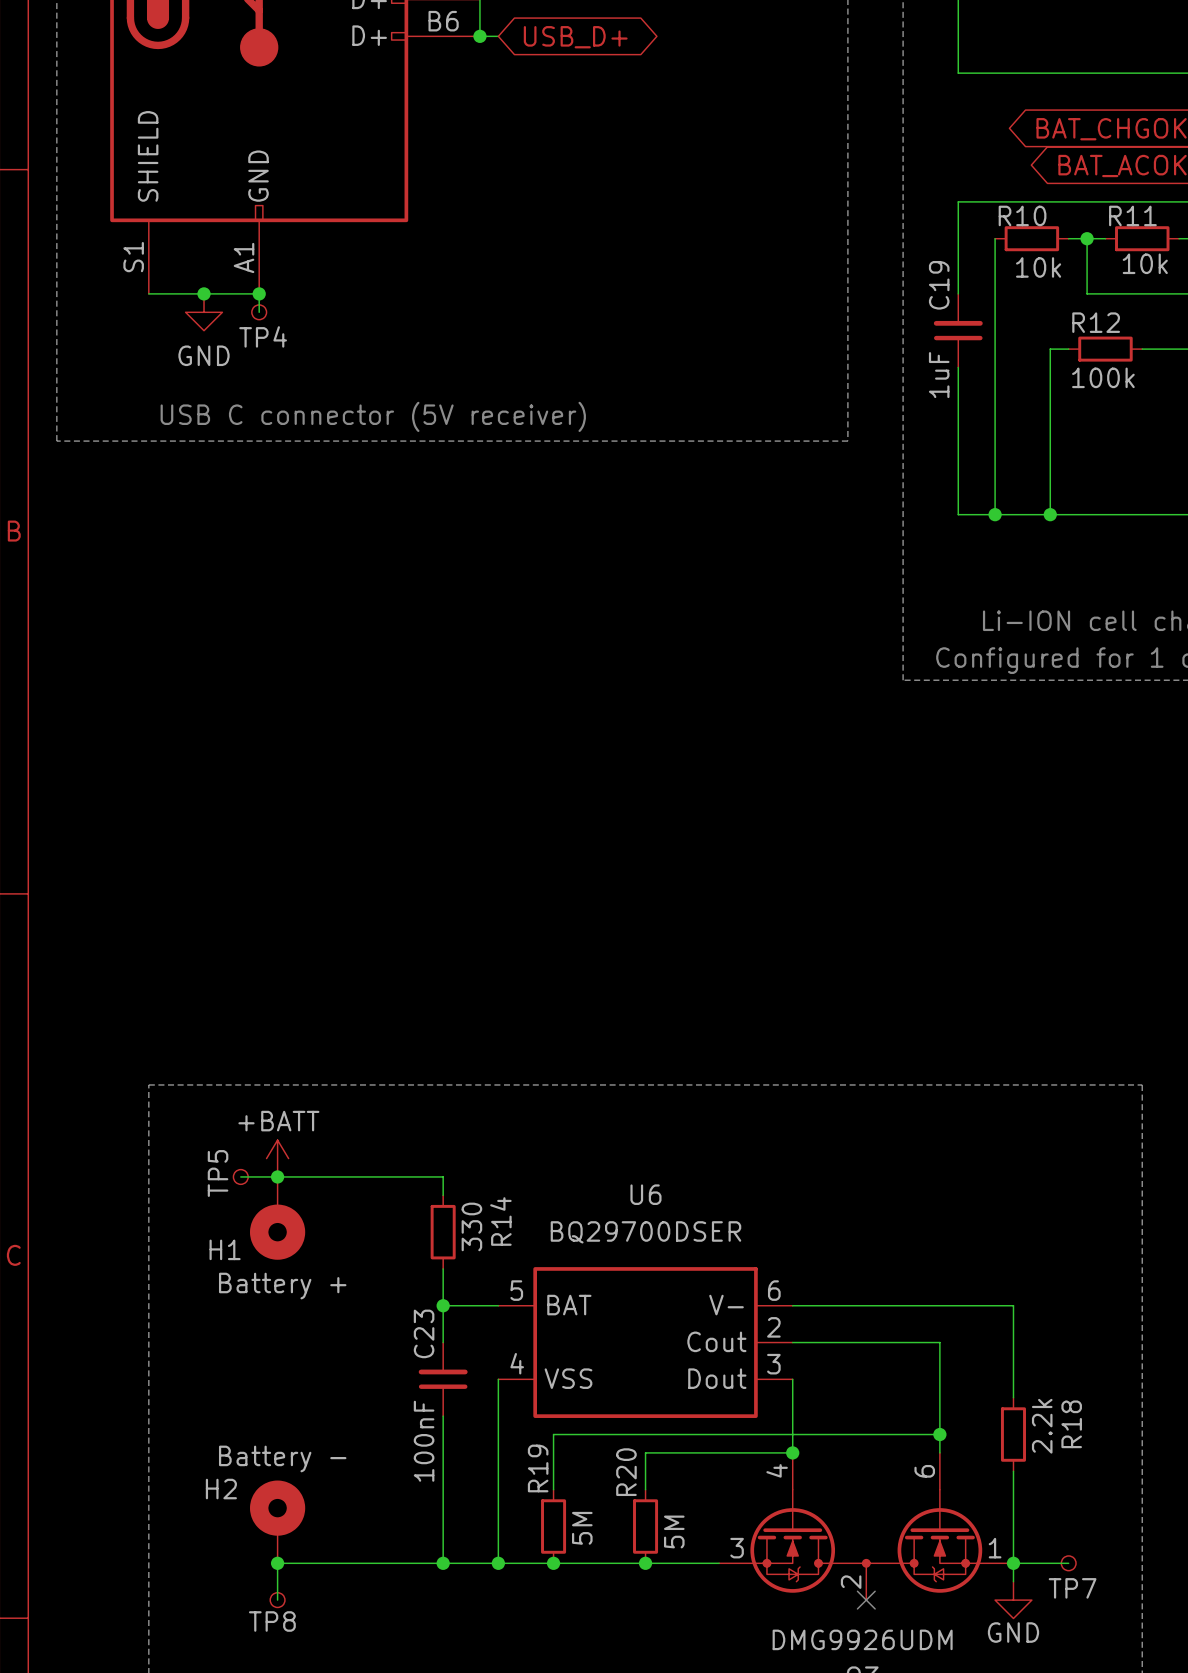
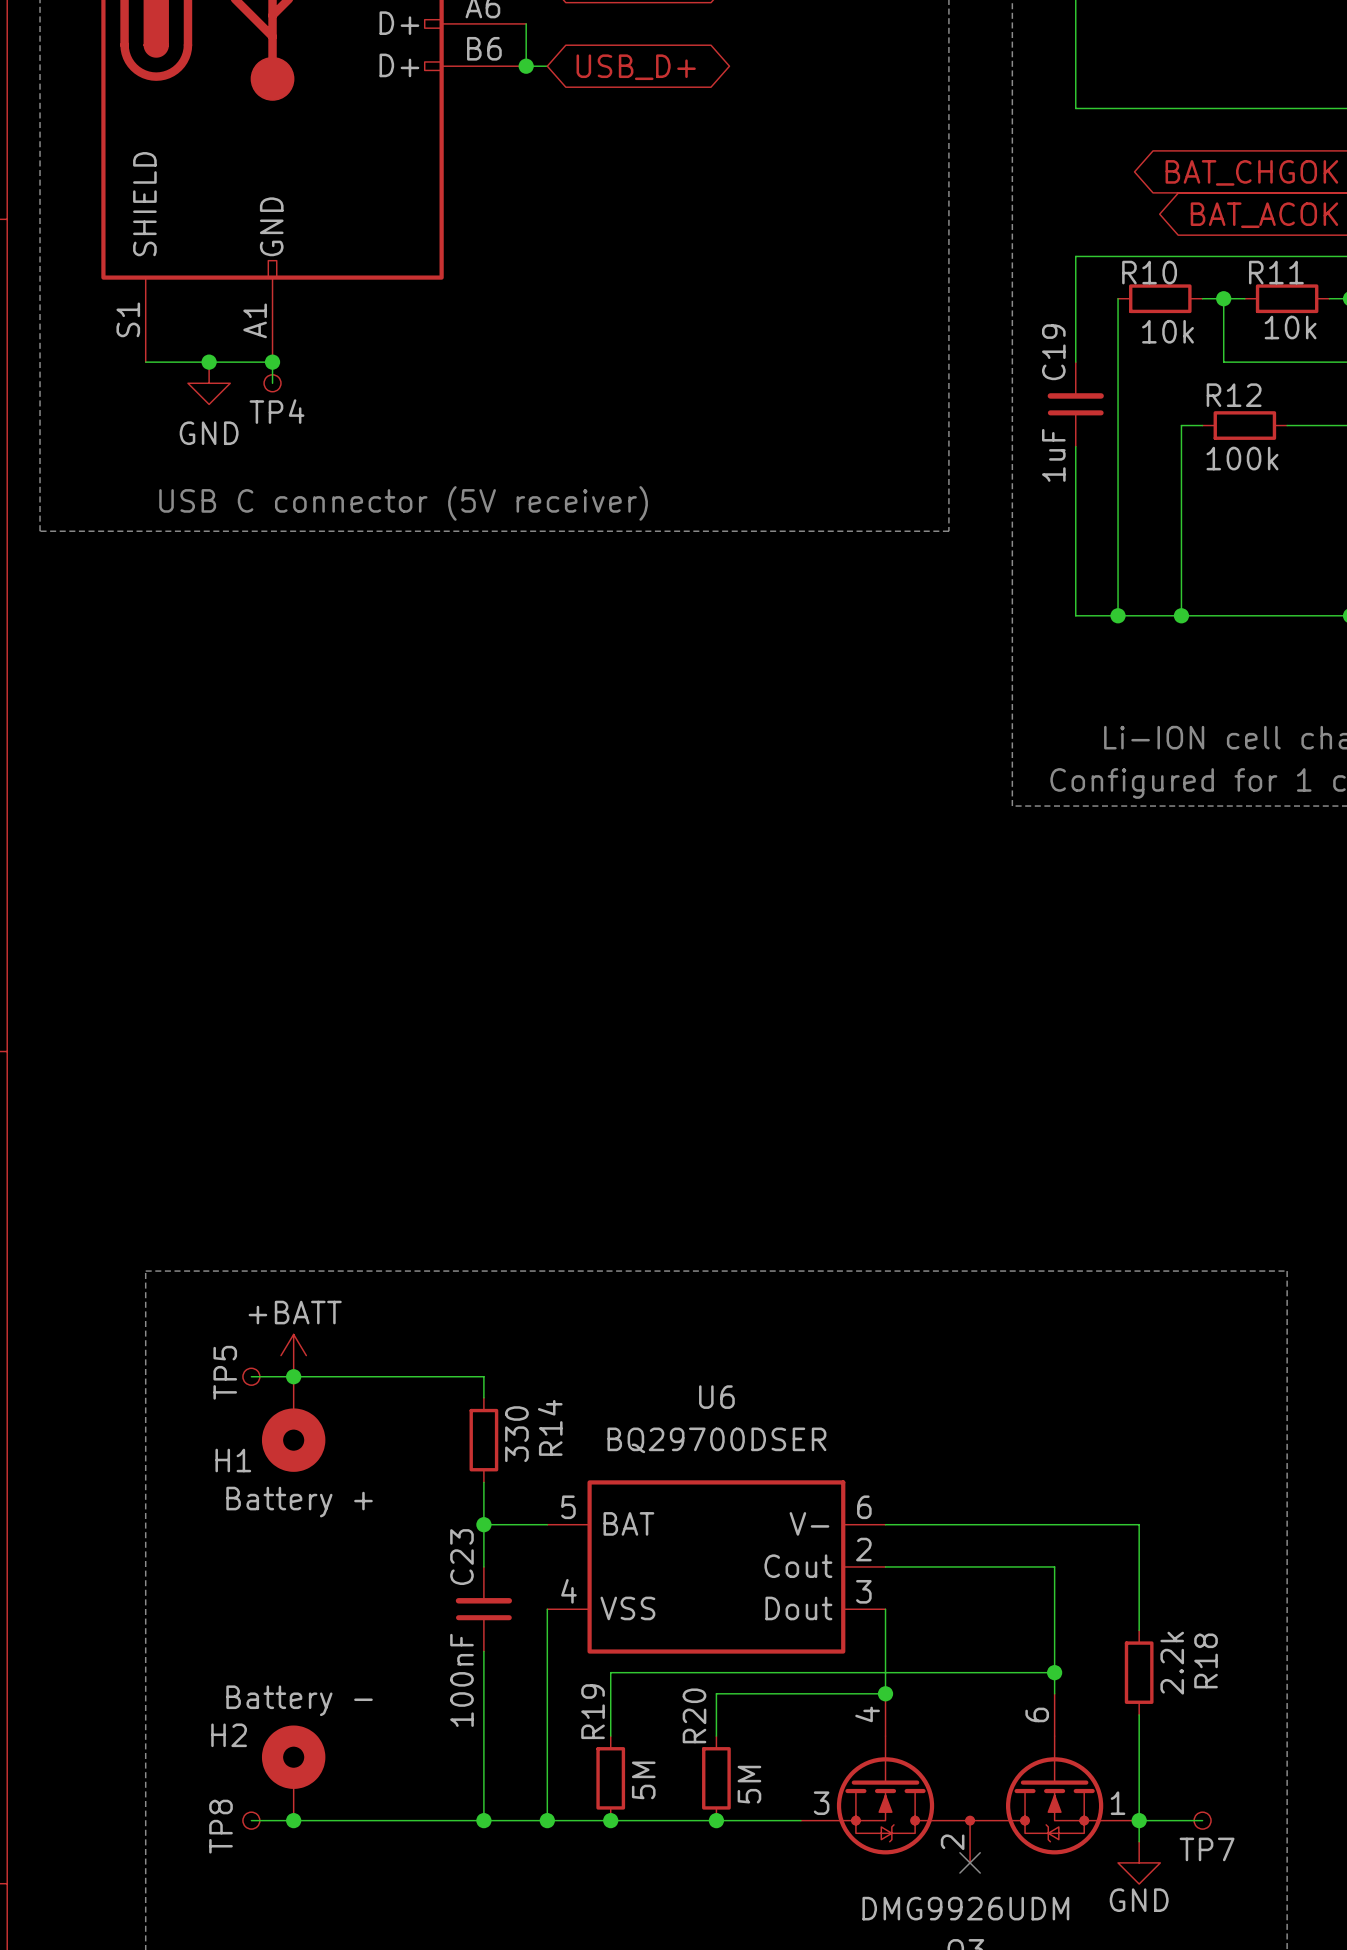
wire: (277, 1563) (277, 1600) -> (293, 1820) (251, 1820)
TP8 position: (277, 1600) -> (251, 1820)
TP8 name rotation: 0° (272, 1621) -> 90° counterclockwise (221, 1826)

